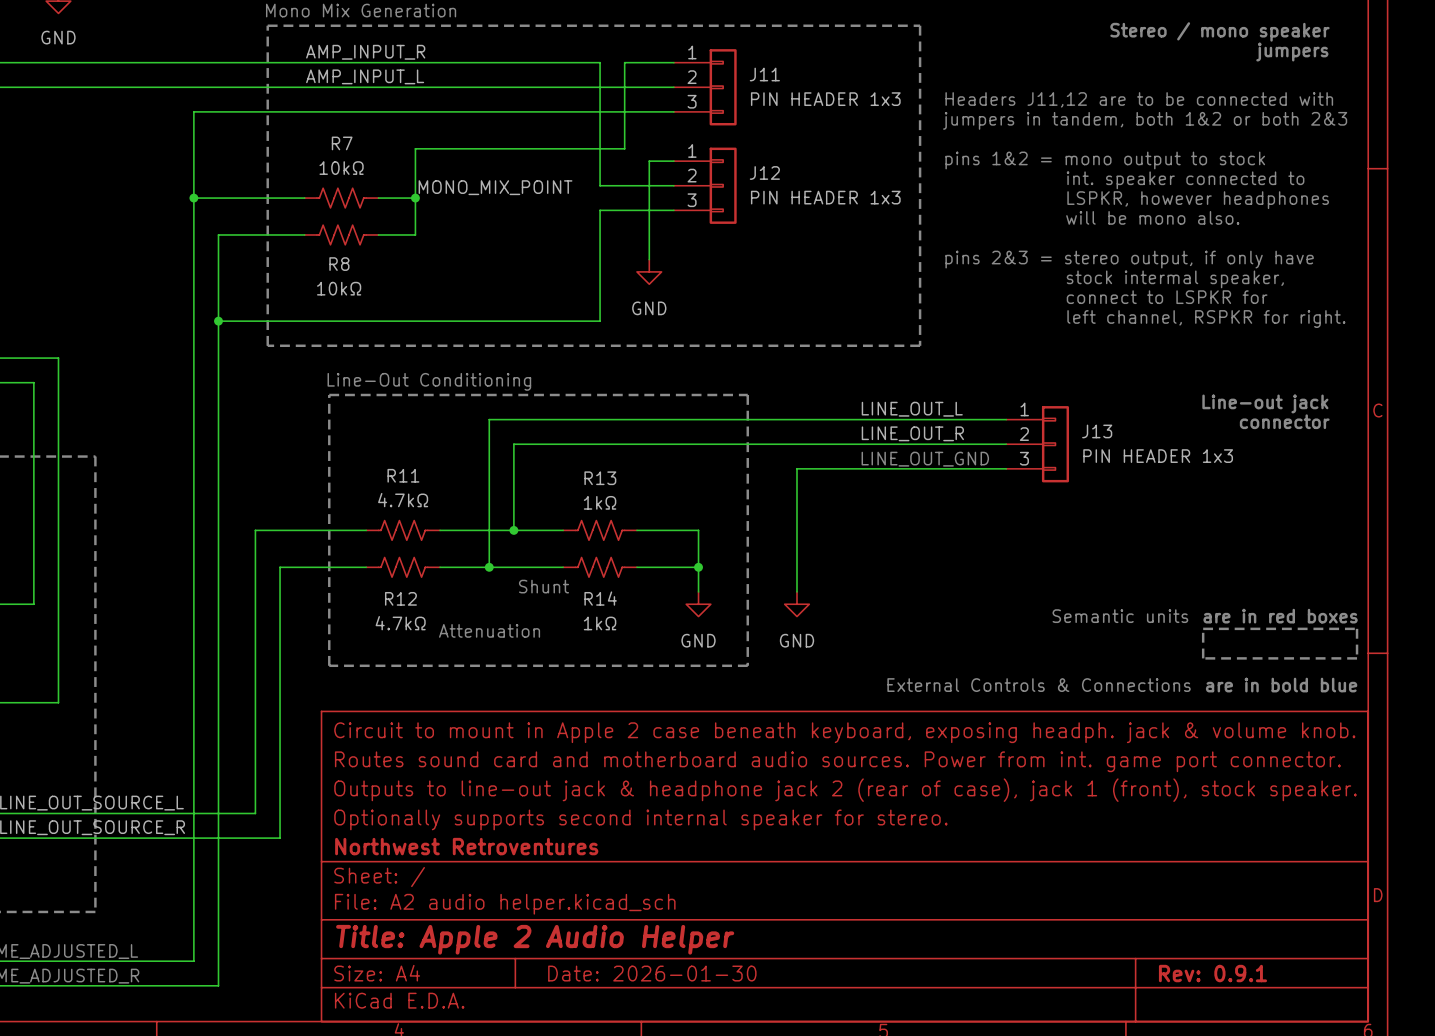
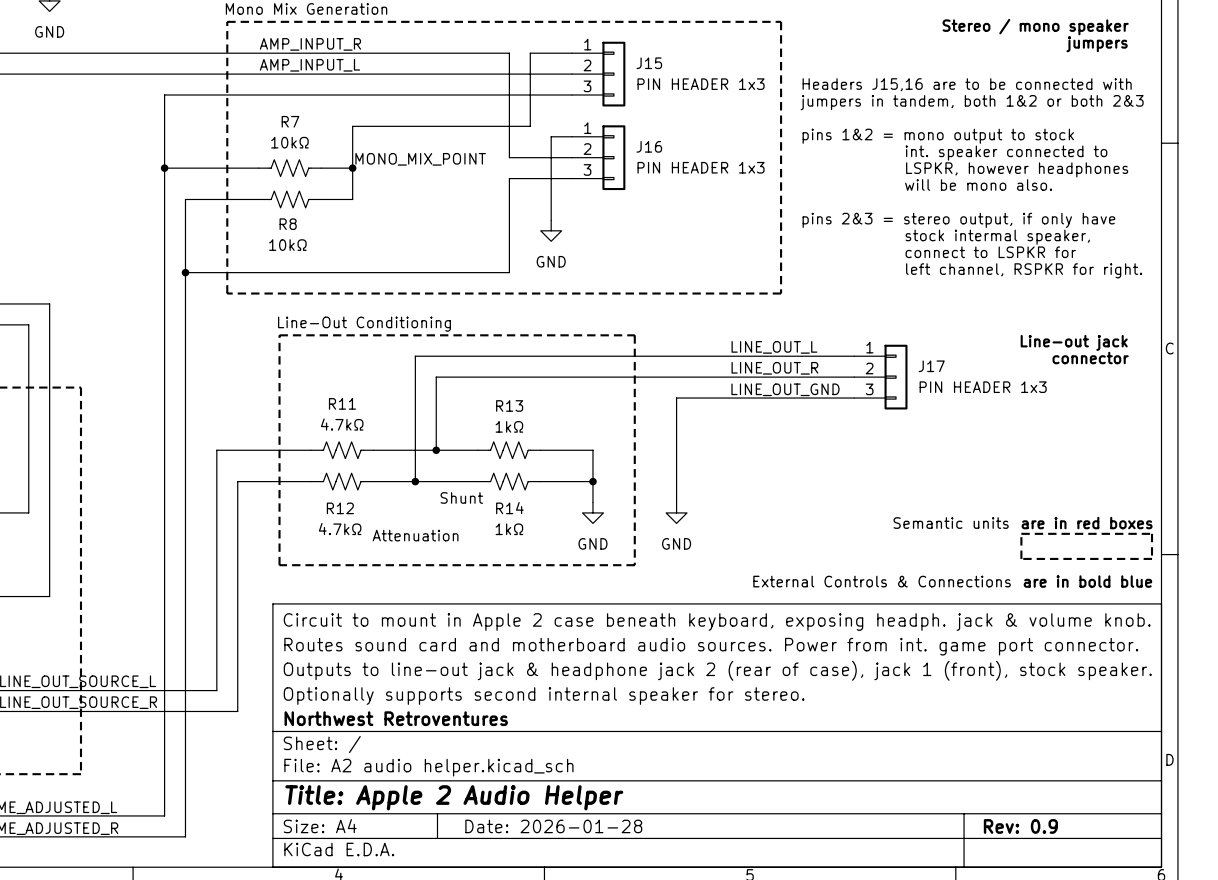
J11 name: J11 (764, 74) -> J15 (649, 63)
text: Headers J11,12 are to be connected with (1139, 99) -> Headers J15,16 are to be connected with (967, 84)
J12 name: J12 (764, 172) -> J16 (649, 146)
J13 name: J13 (1097, 431) -> J17 (931, 366)
title block: Date: 2026-01-30 (652, 973) -> Date: 2026-01-28 (553, 826)
title block: Rev: 0.9.1 (1212, 973) -> Rev: 0.9 (1020, 826)

